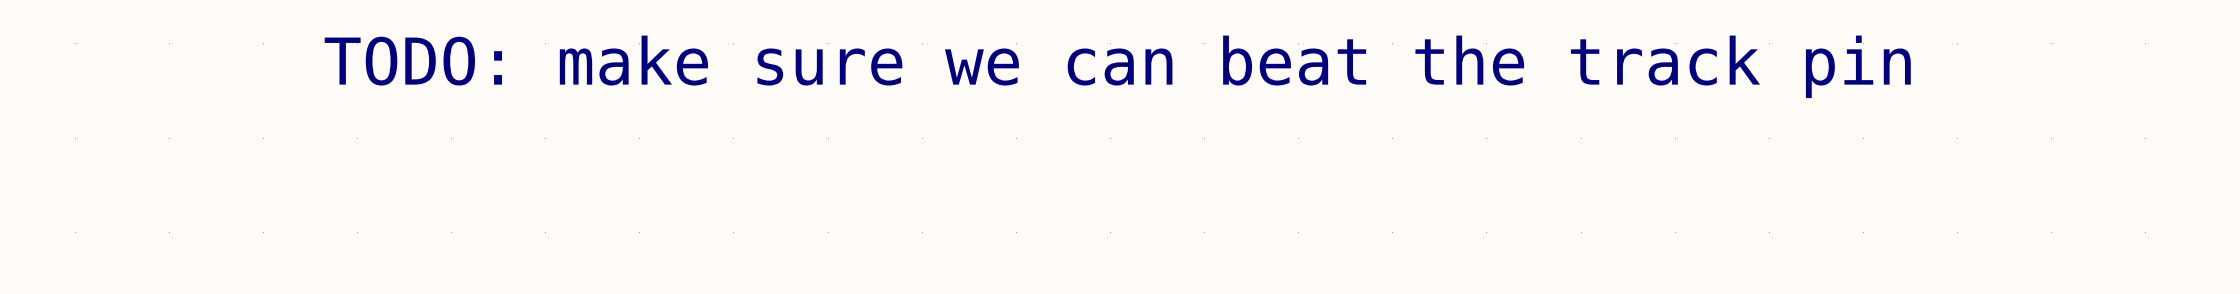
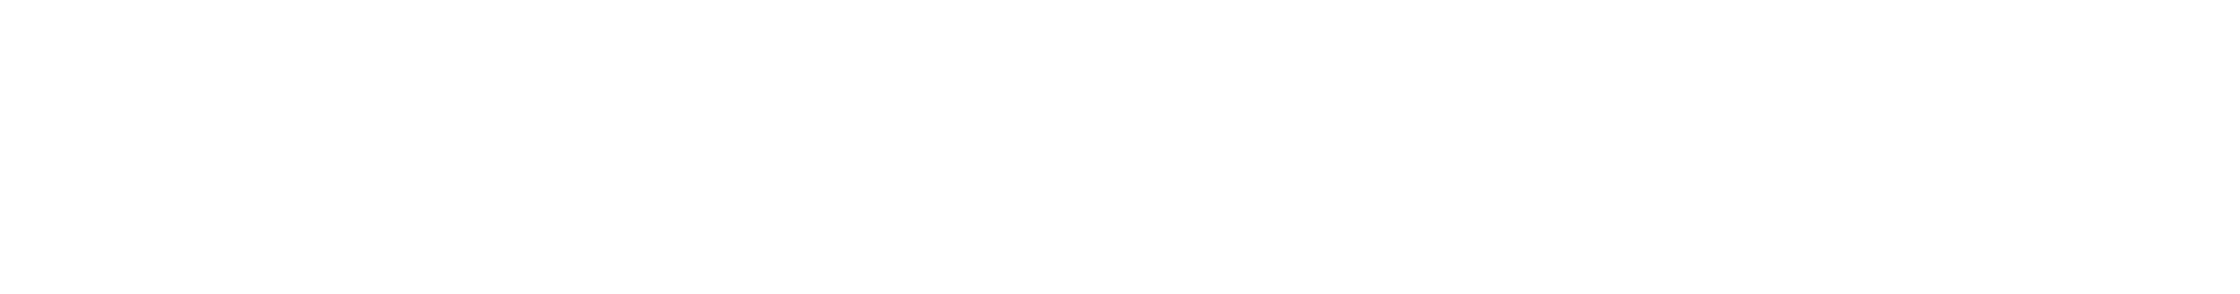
text: TODO: make sure we can beat the track pin (1117, 66) -> none

